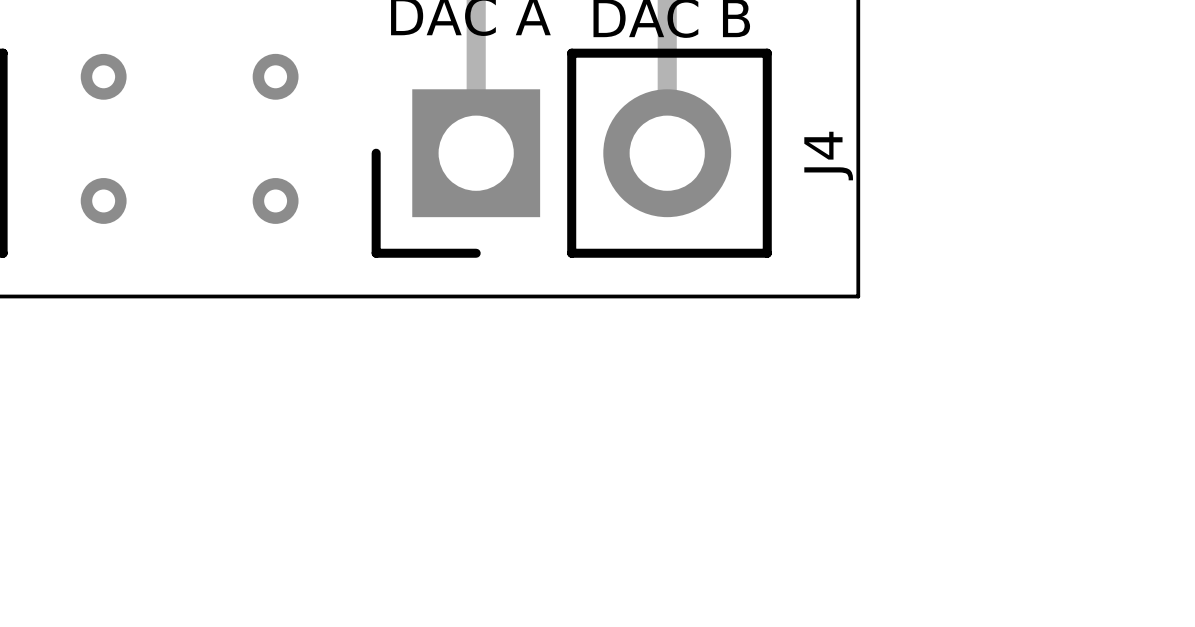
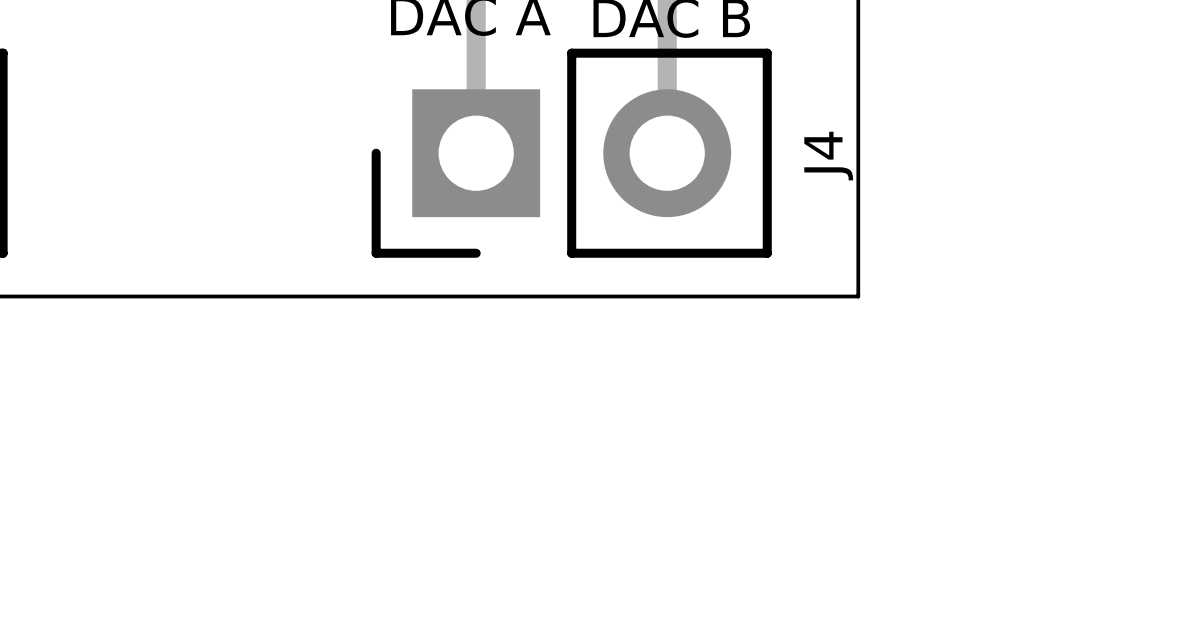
via: (103, 76) -> none
via: (275, 76) -> none
via: (103, 200) -> none
via: (275, 200) -> none

